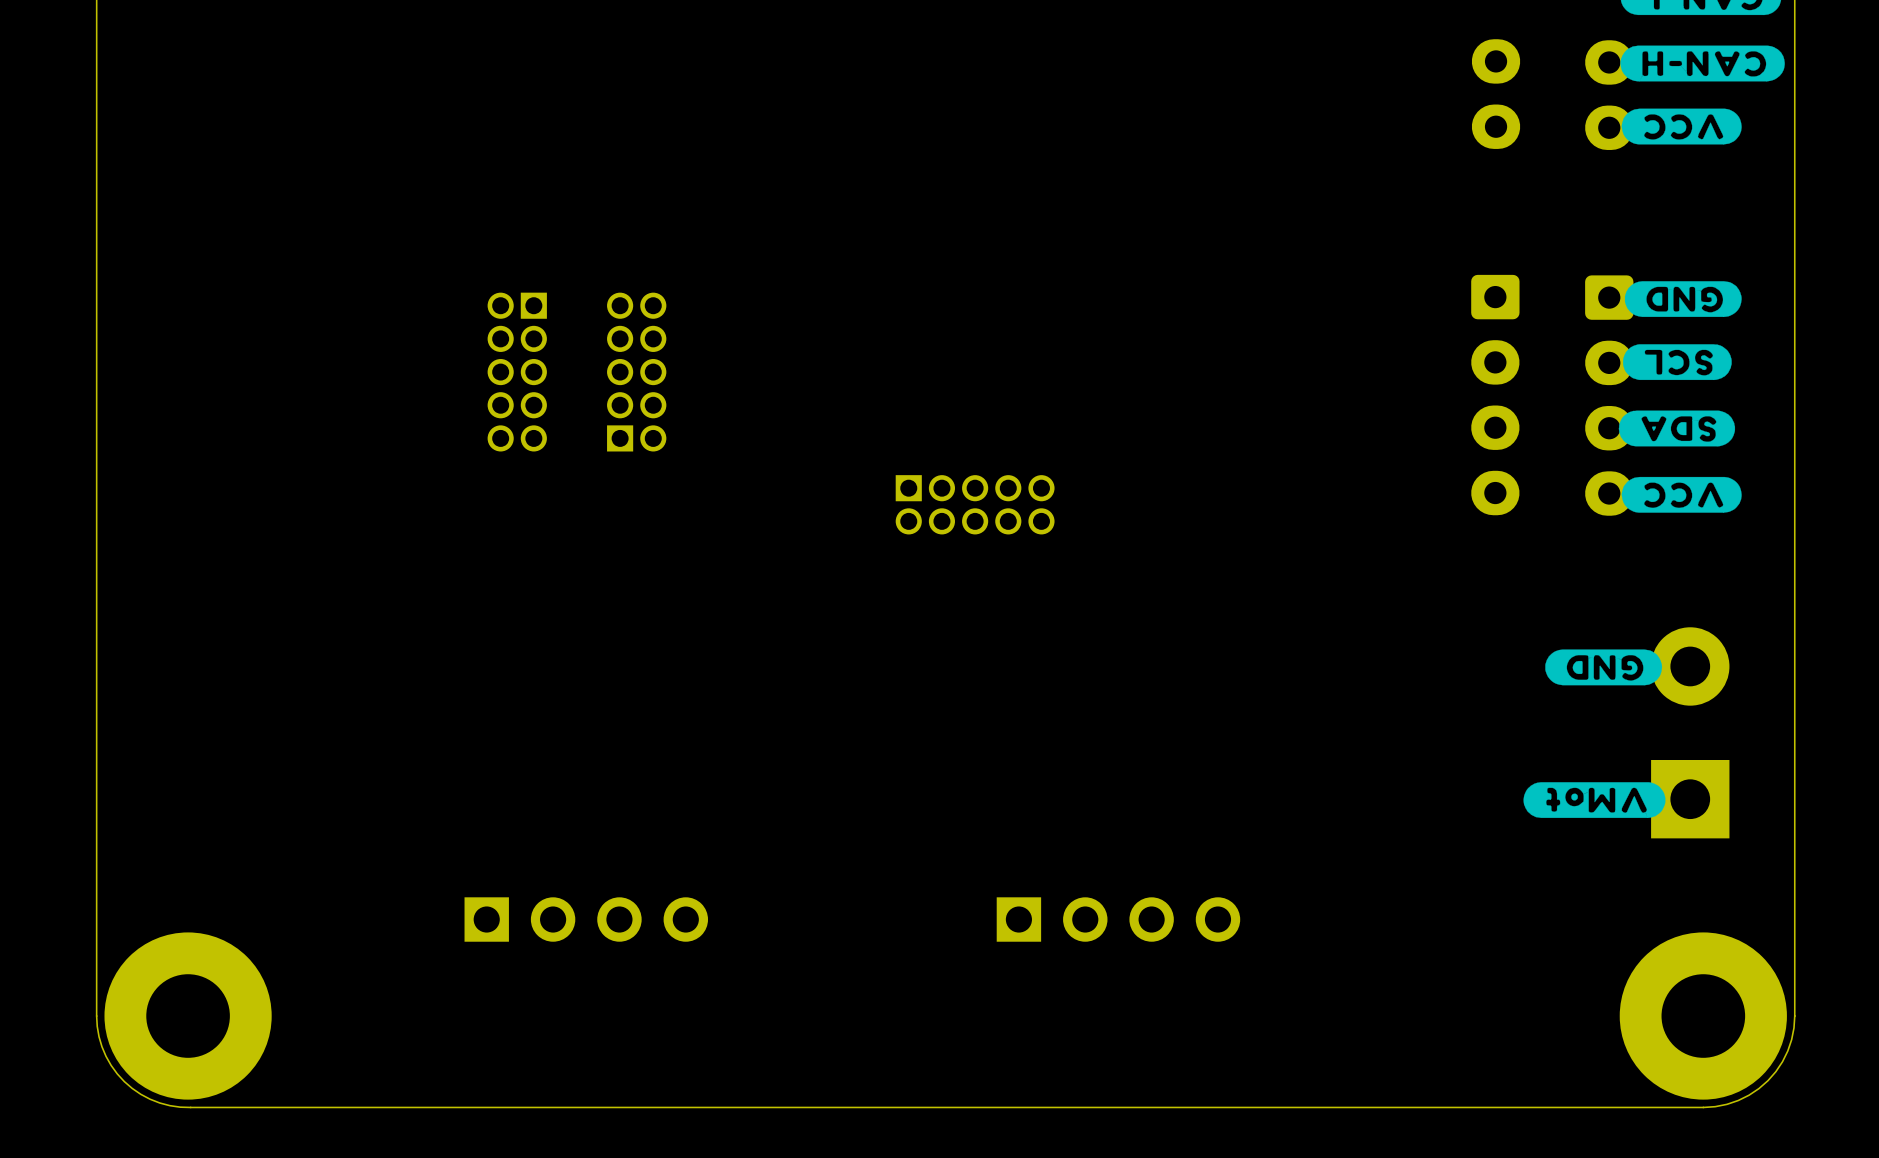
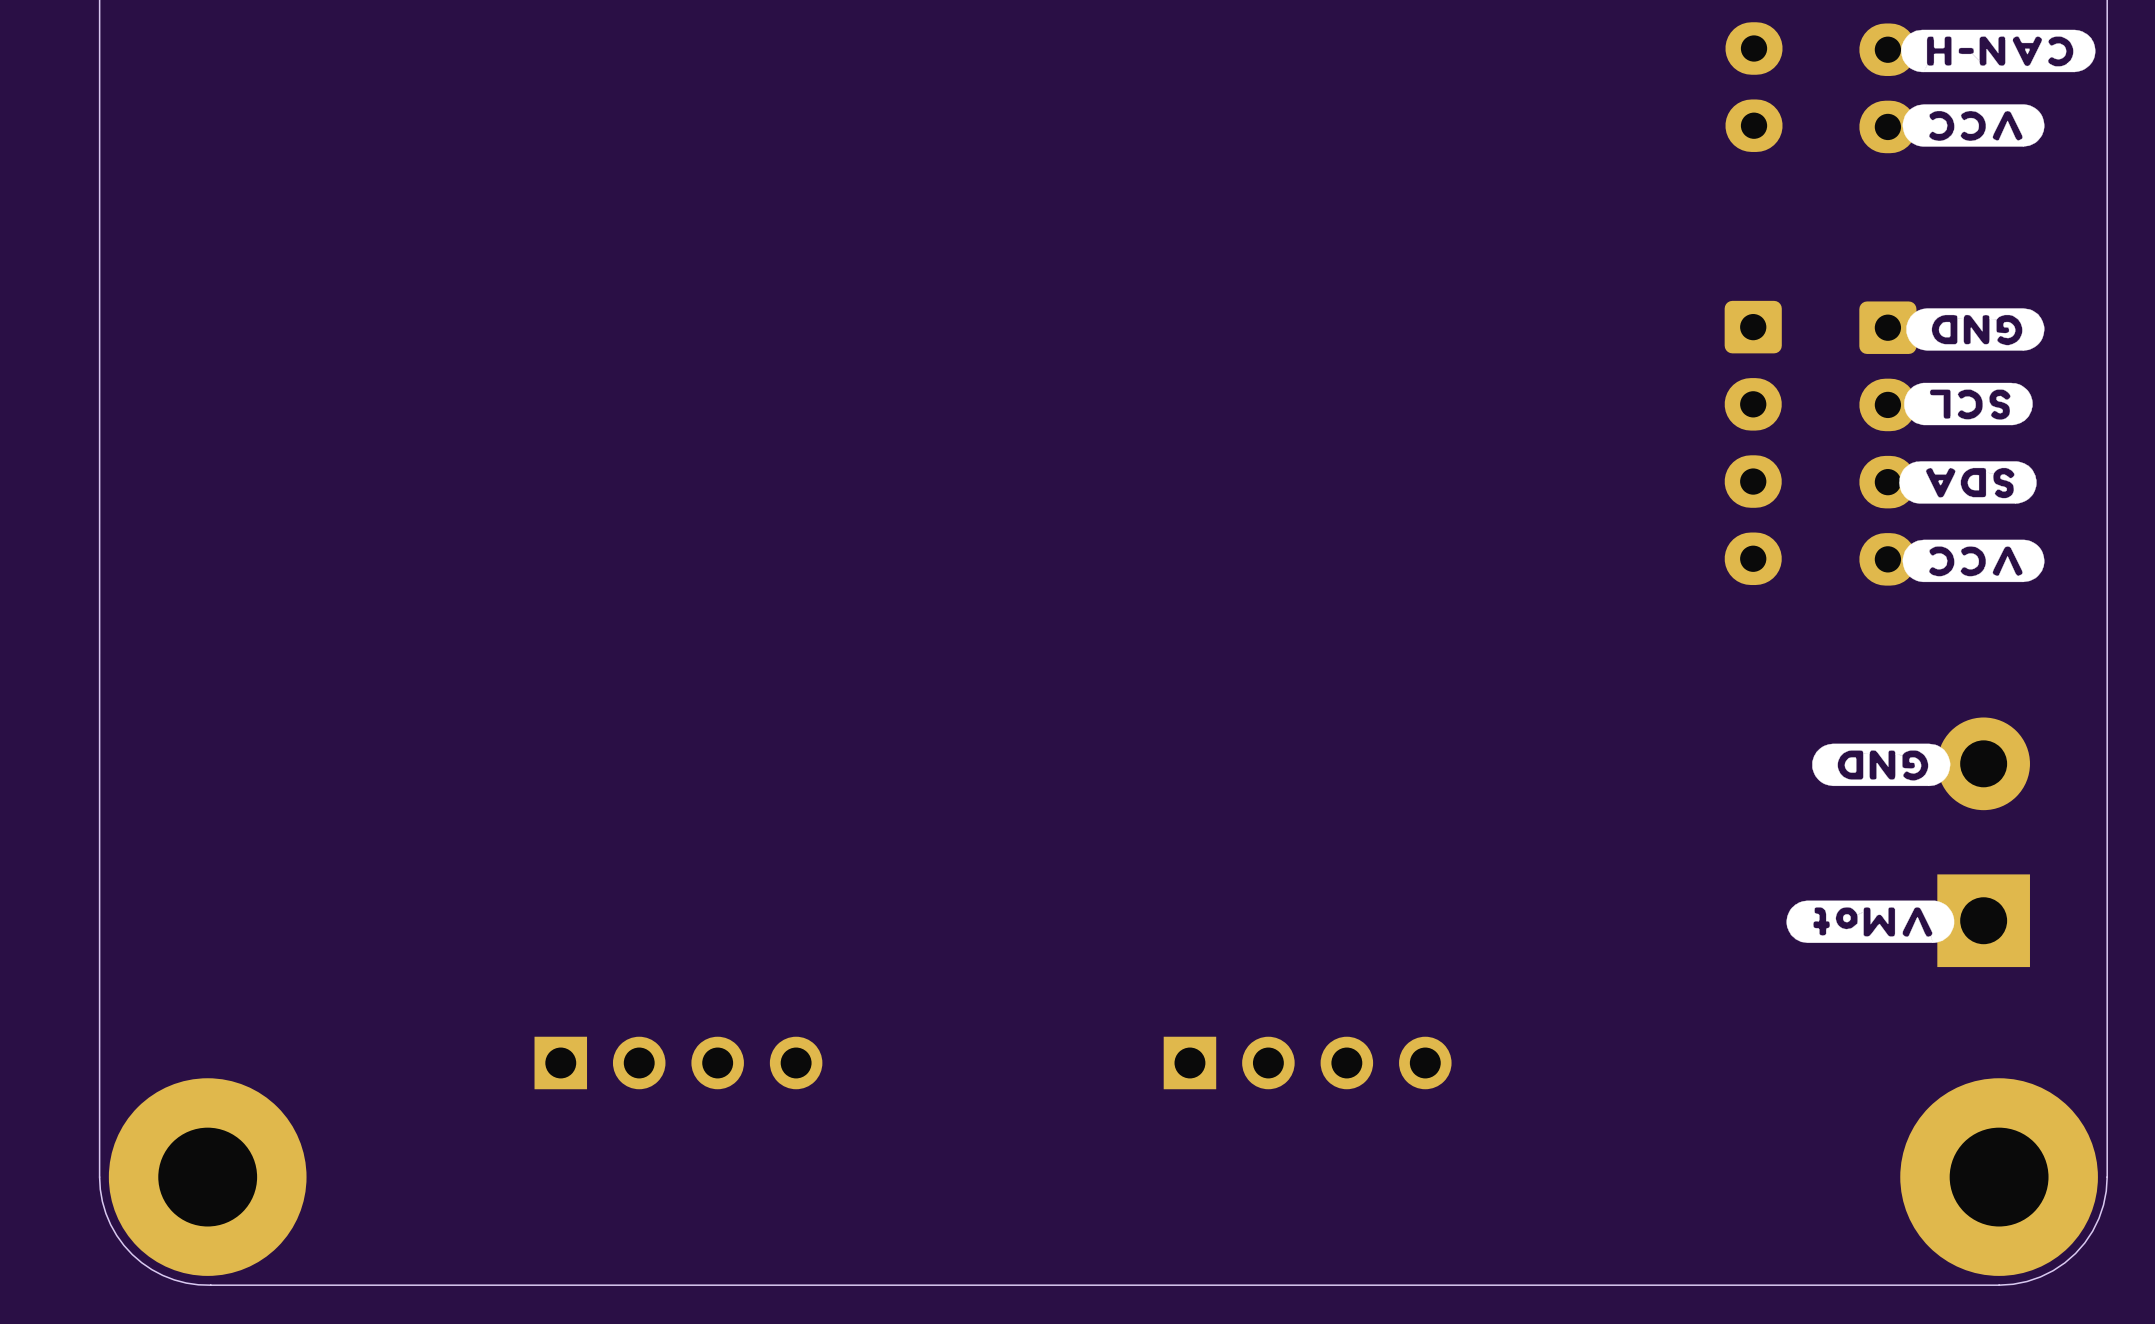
part: (517, 372) -> none
part: (636, 372) -> none
part: (975, 504) -> none

